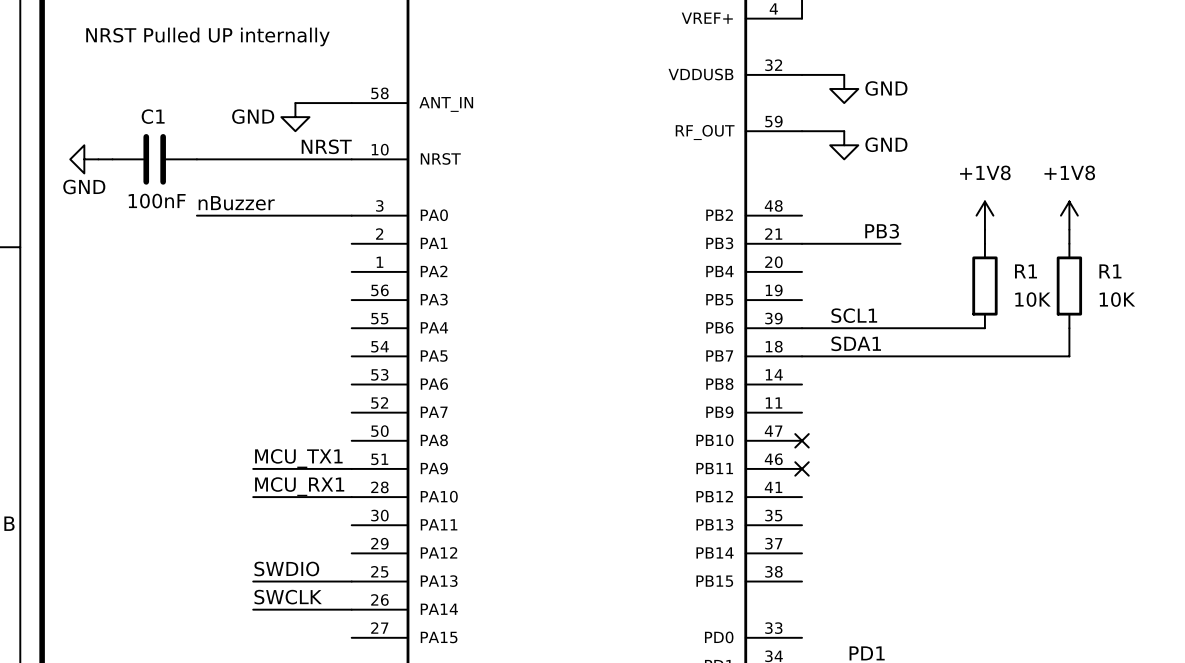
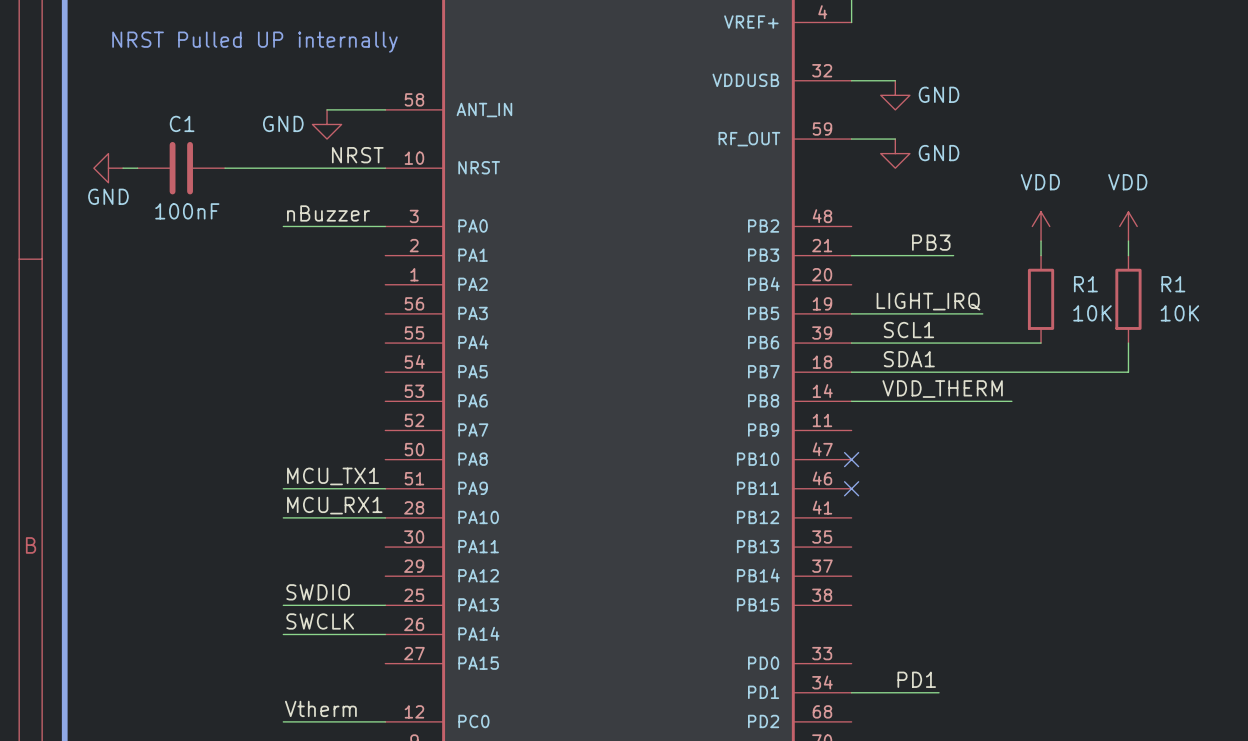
label position: nBuzzer (236, 203) -> nBuzzer (328, 213)
wire: (196, 215) (253, 215) -> none
power symbol: +1V8 (984, 215) -> VDD (1041, 226)
power symbol: +1V8 (1069, 215) -> VDD (1128, 226)
label: none -> LIGHT_IRQ (928, 301)
wire: none -> (851, 313) (982, 313)
label: none -> VDD_THERM (942, 389)
wire: none -> (851, 401) (1011, 401)

